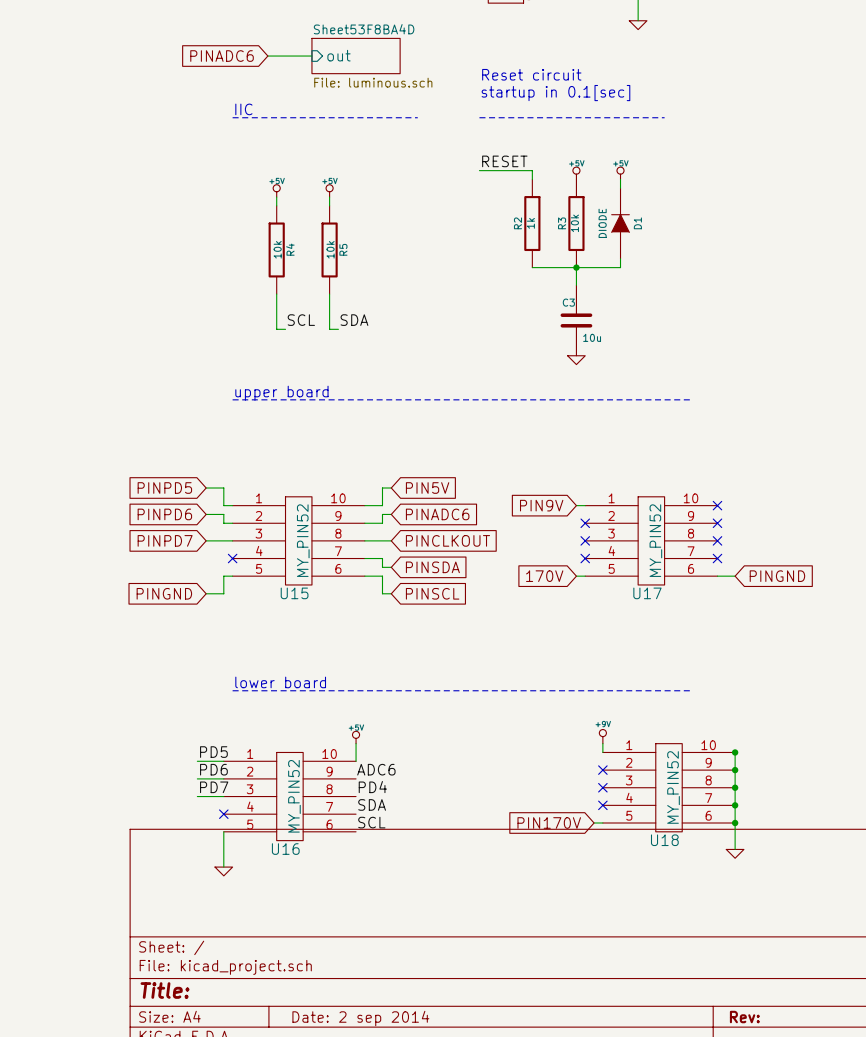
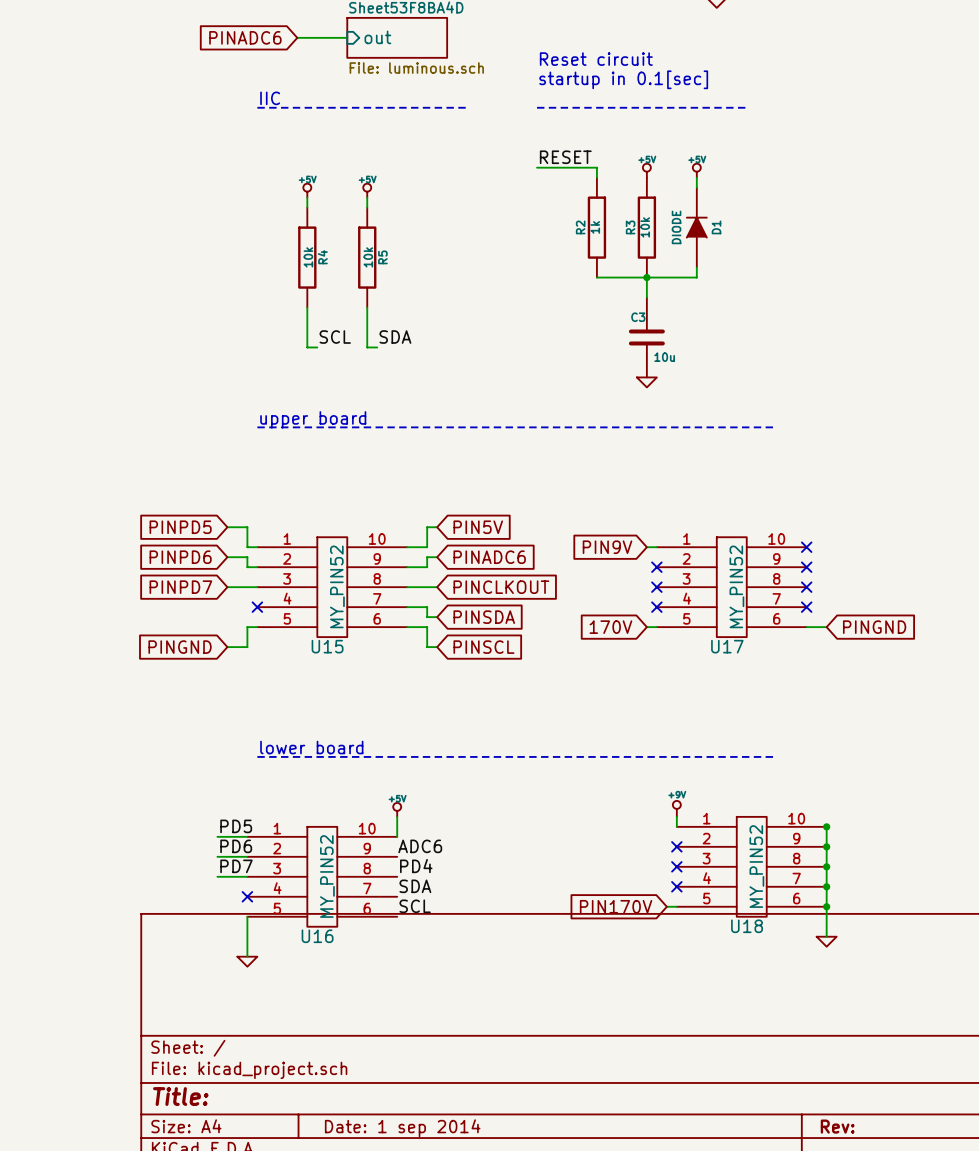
title block: Date: 2 sep 2014 (360, 1018) -> Date: 1 sep 2014 (402, 1128)

